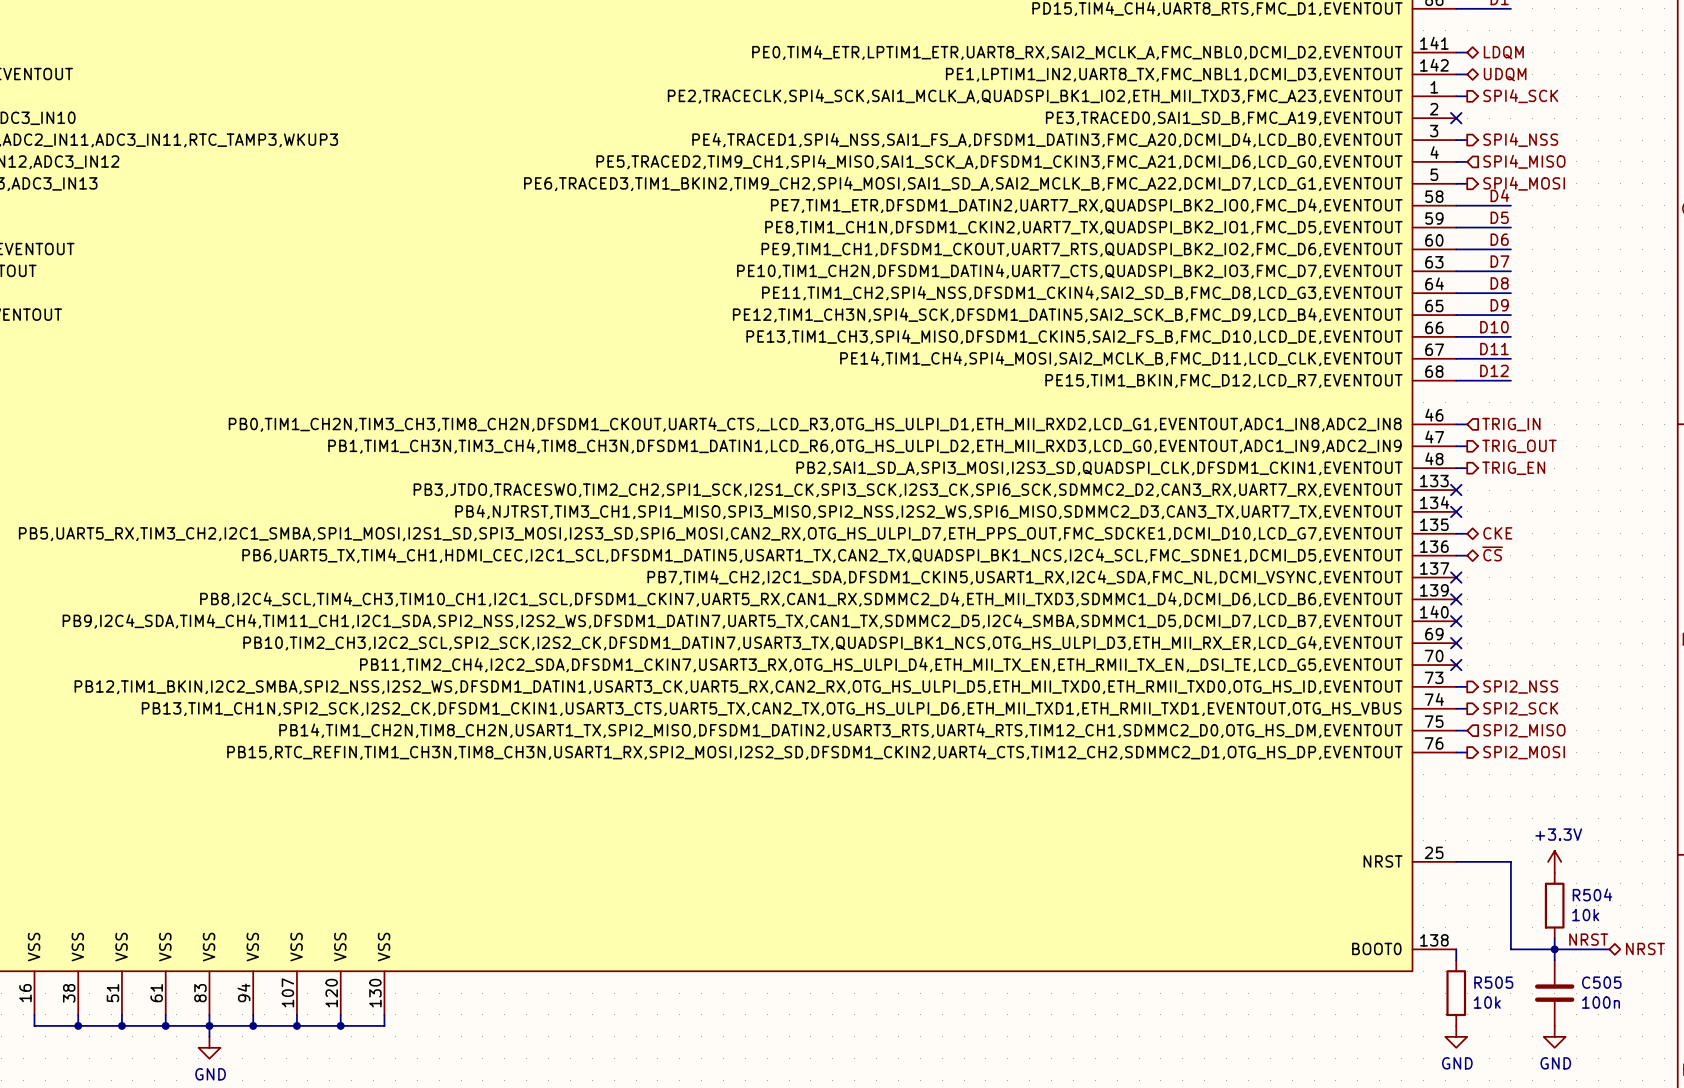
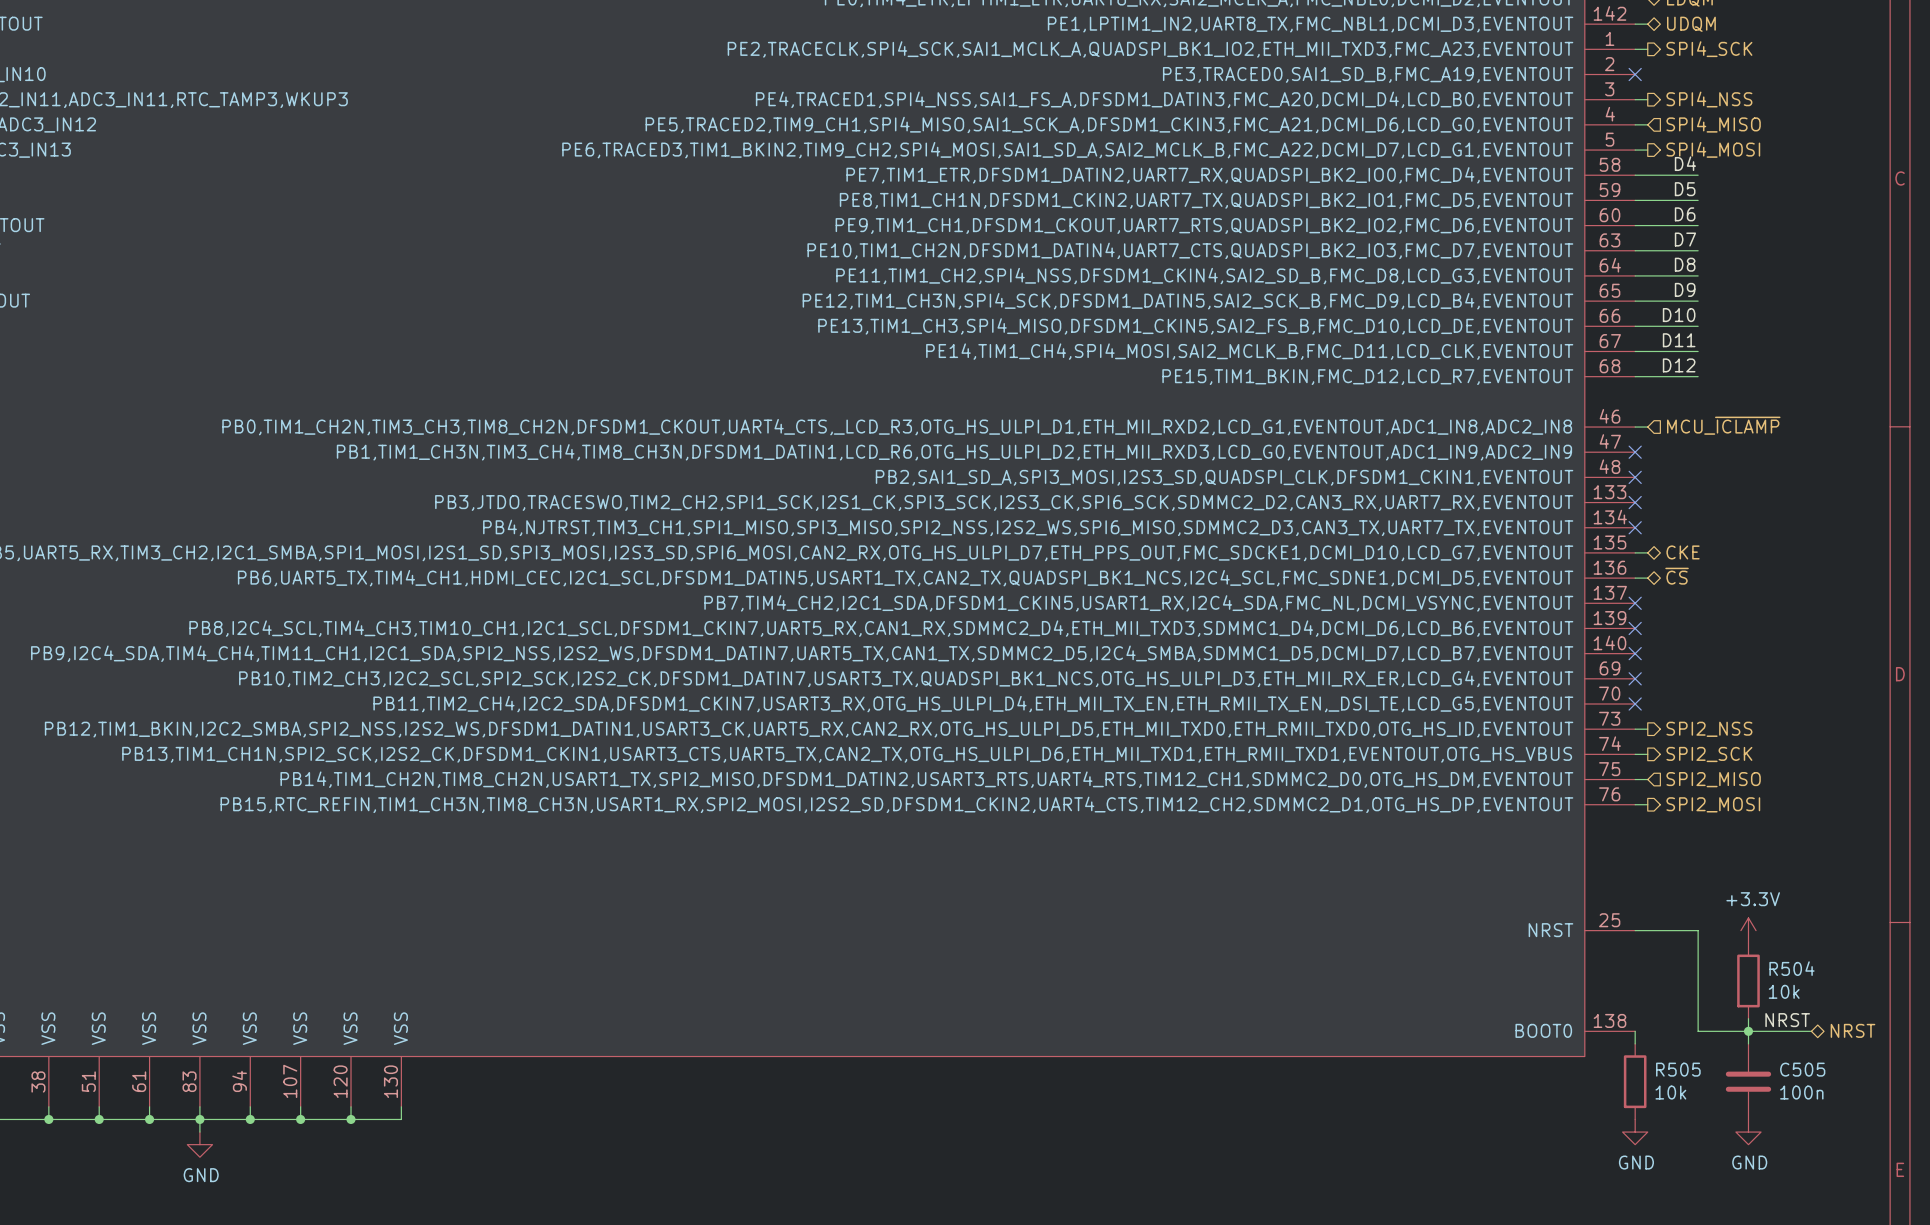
hierarchical label: TRIG_IN (1511, 424) -> MCU_~{ICLAMP} (1723, 425)
wire: (1456, 446) (1467, 446) -> none
no-connect mark: none -> (1635, 452)
hierarchical label: TRIG_OUT (1519, 446) -> none
wire: (1456, 468) (1467, 468) -> none
no-connect mark: none -> (1635, 477)
hierarchical label: TRIG_EN (1513, 468) -> none

